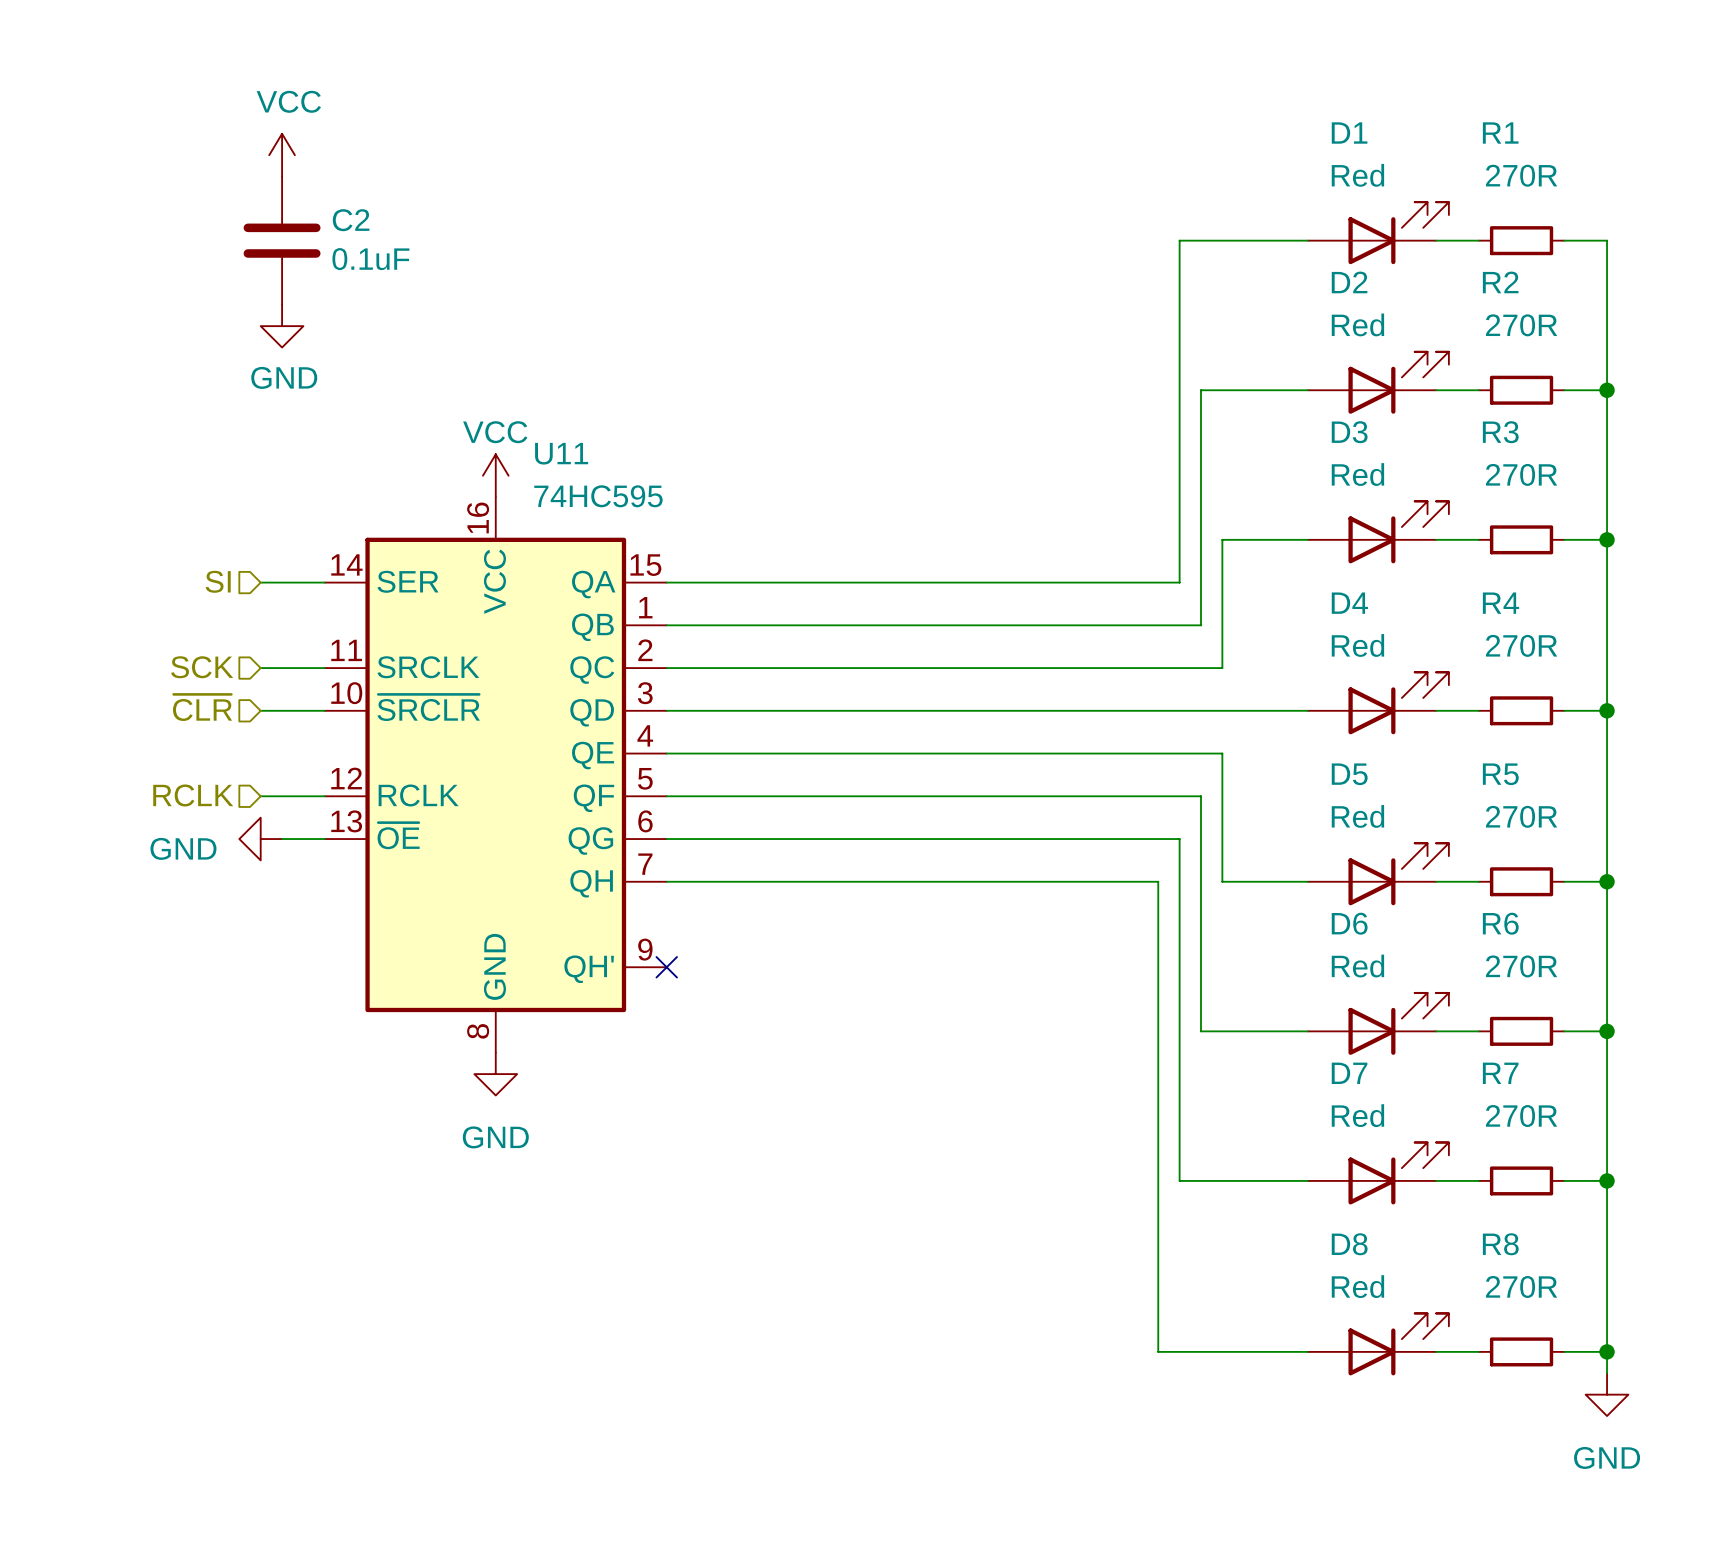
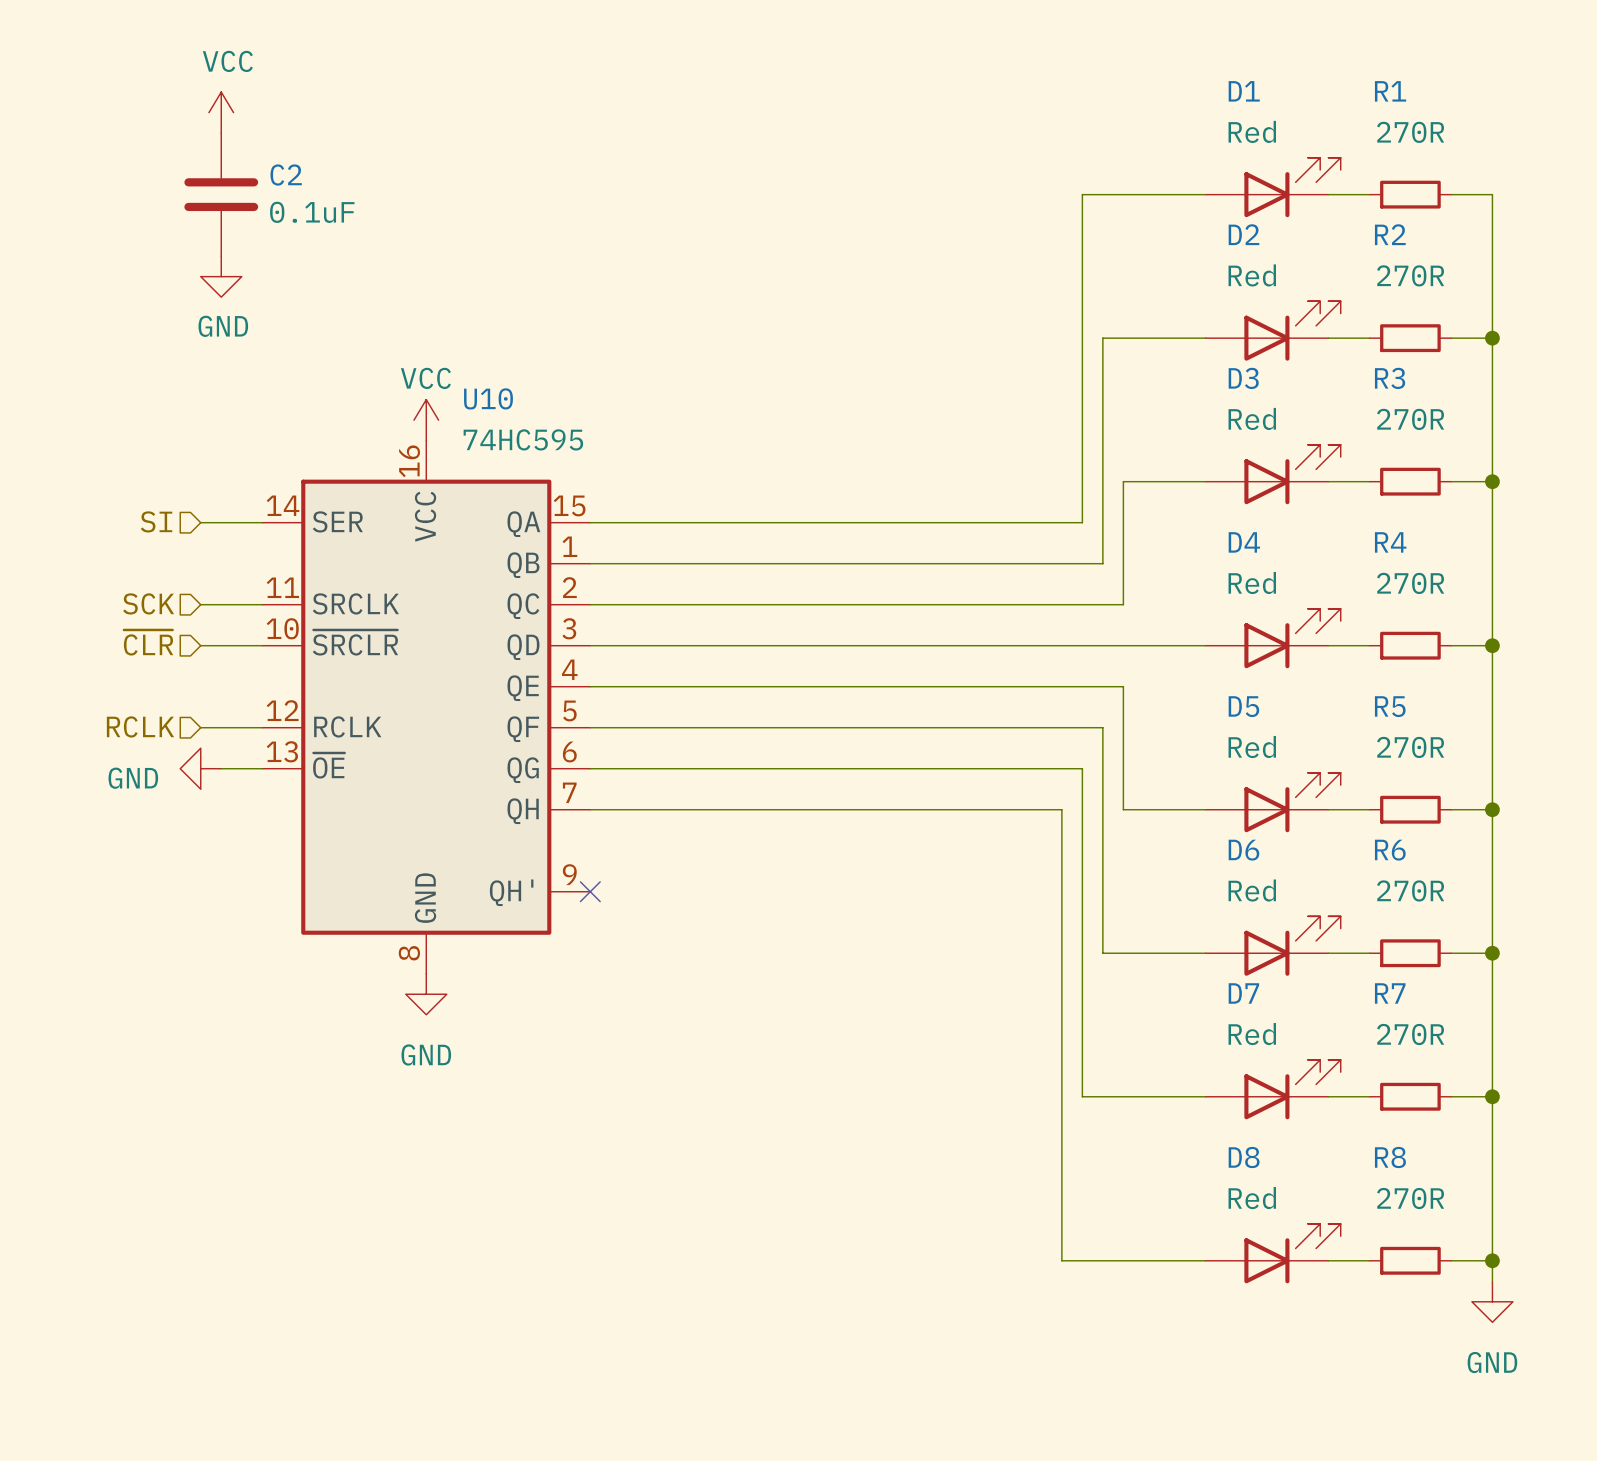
U11 name: U11 (561, 453) -> U10 (488, 398)

